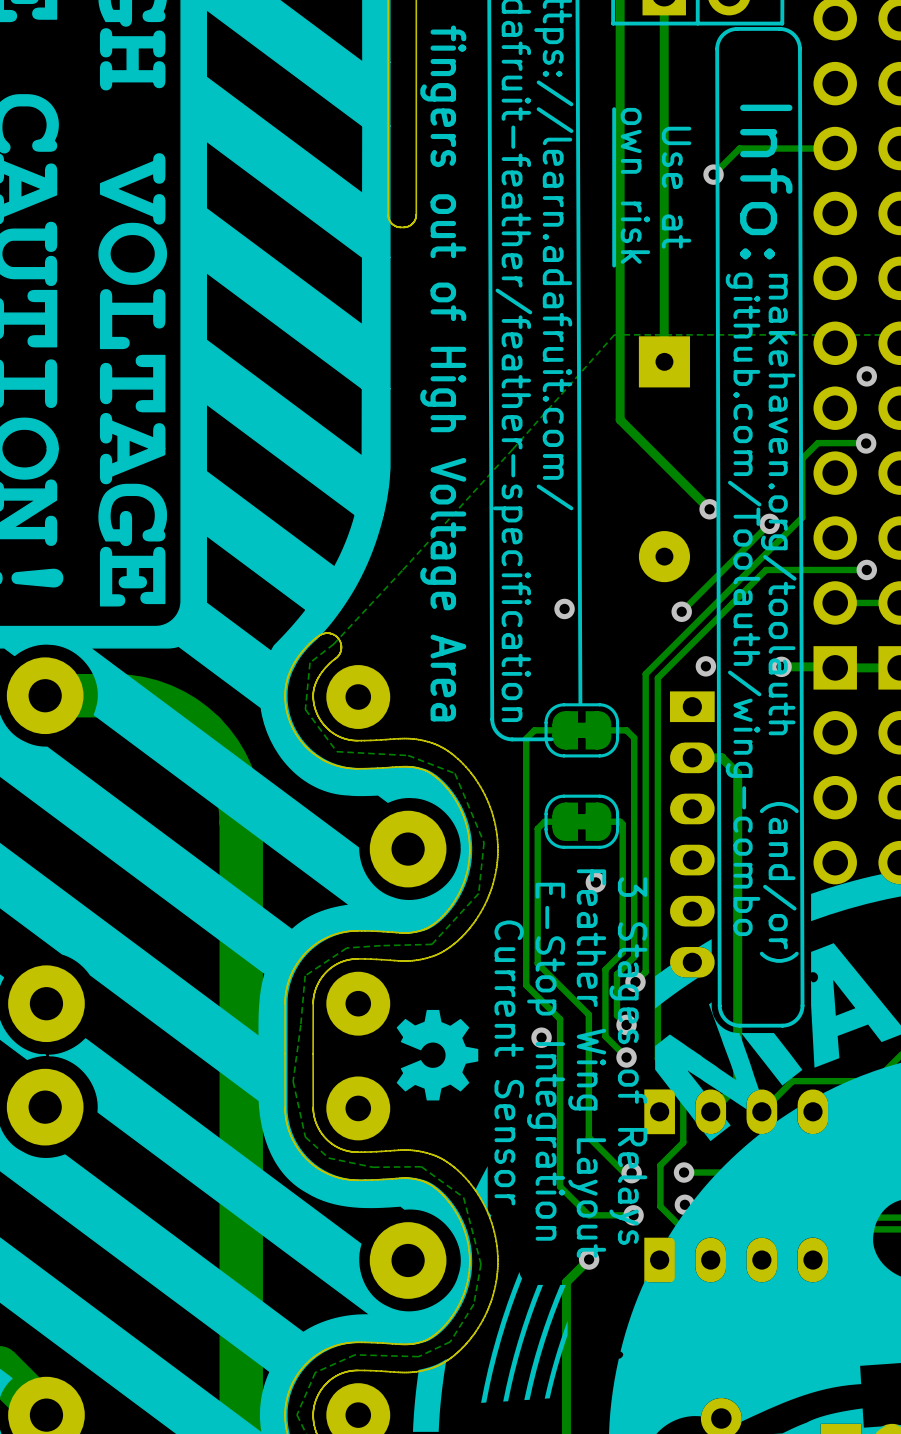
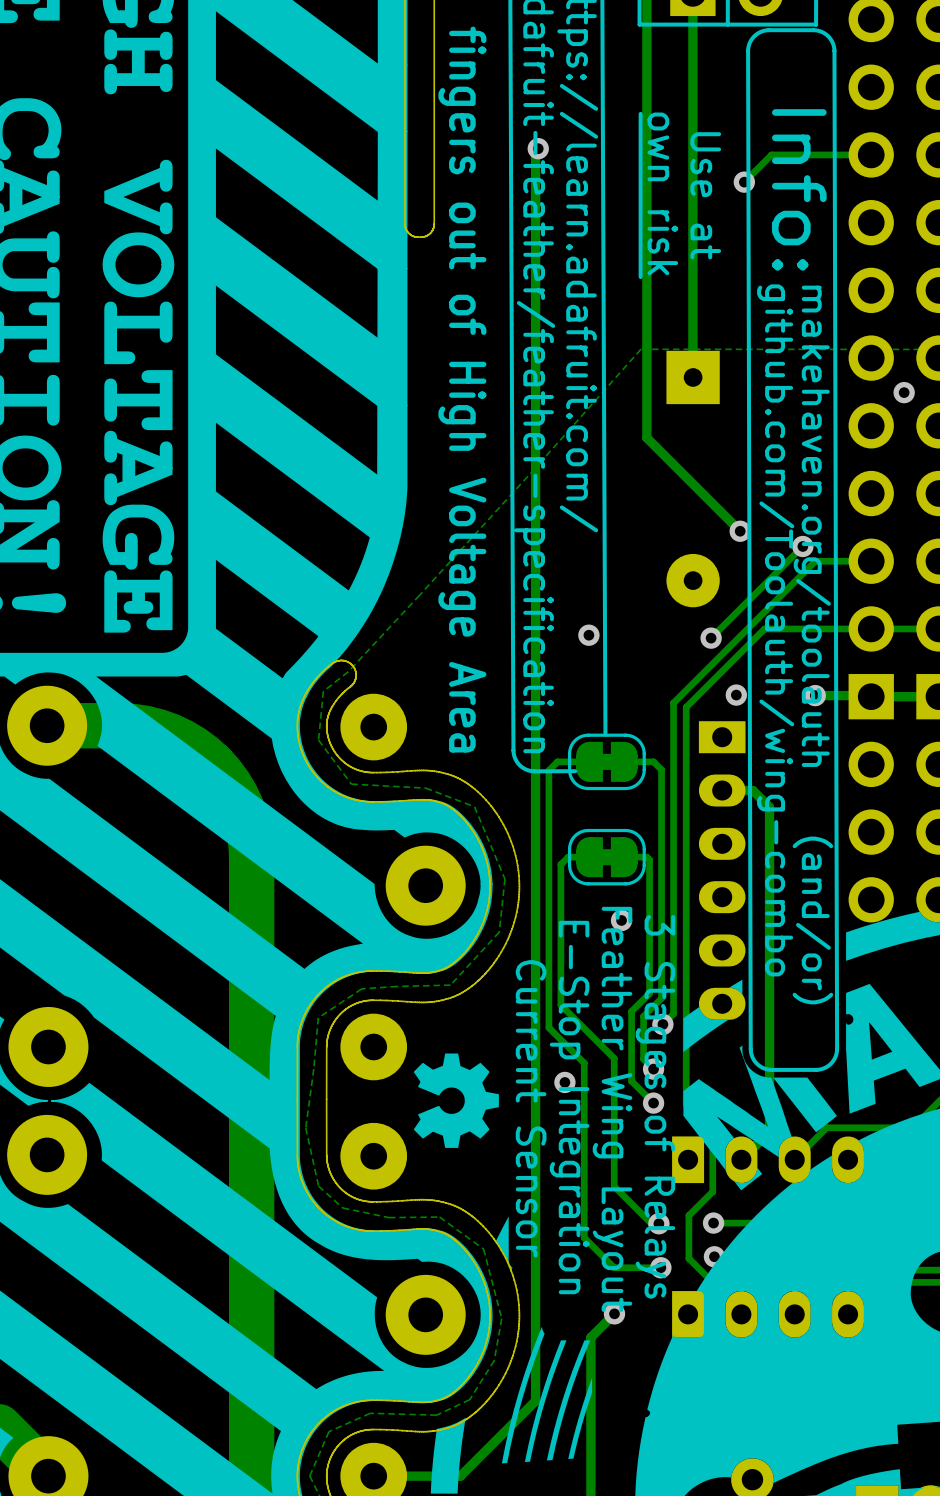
track: none -> (538, 148) (535, 151) (535, 1401) (460, 1476) (373, 1476)
via: none -> (538, 148)
track: (866, 443) (817, 443) (802, 458) (802, 517) (781, 538) -> (871, 561) (815, 561)
via: (866, 443) -> none
track: (866, 569) (765, 569) (732, 602) -> (871, 628) (764, 628)
via: (866, 569) -> none

